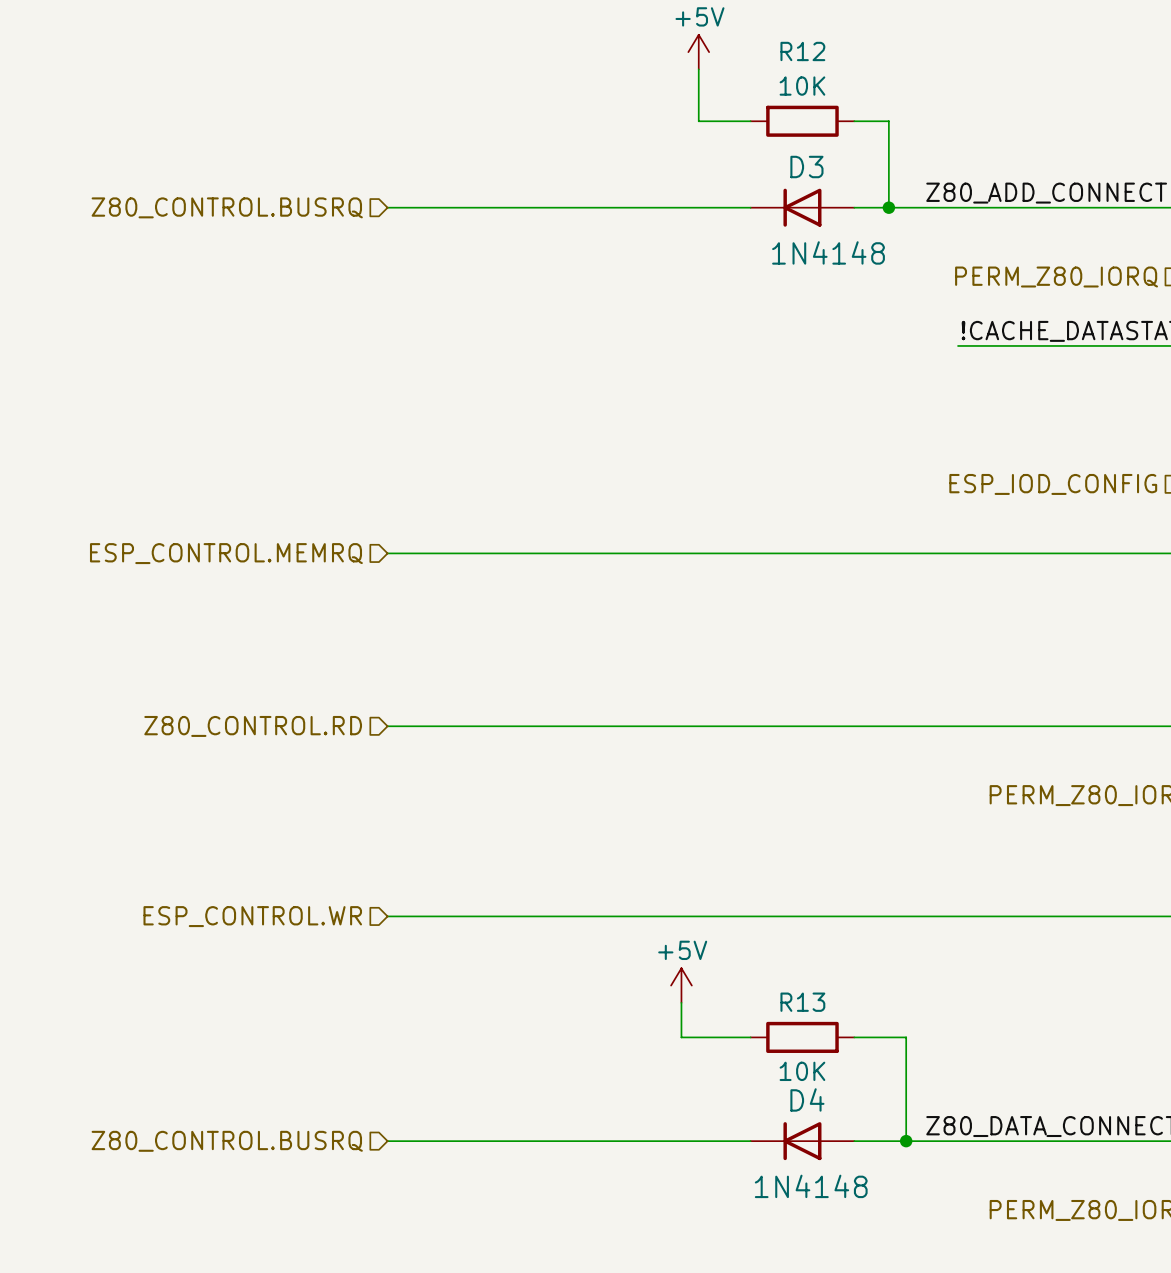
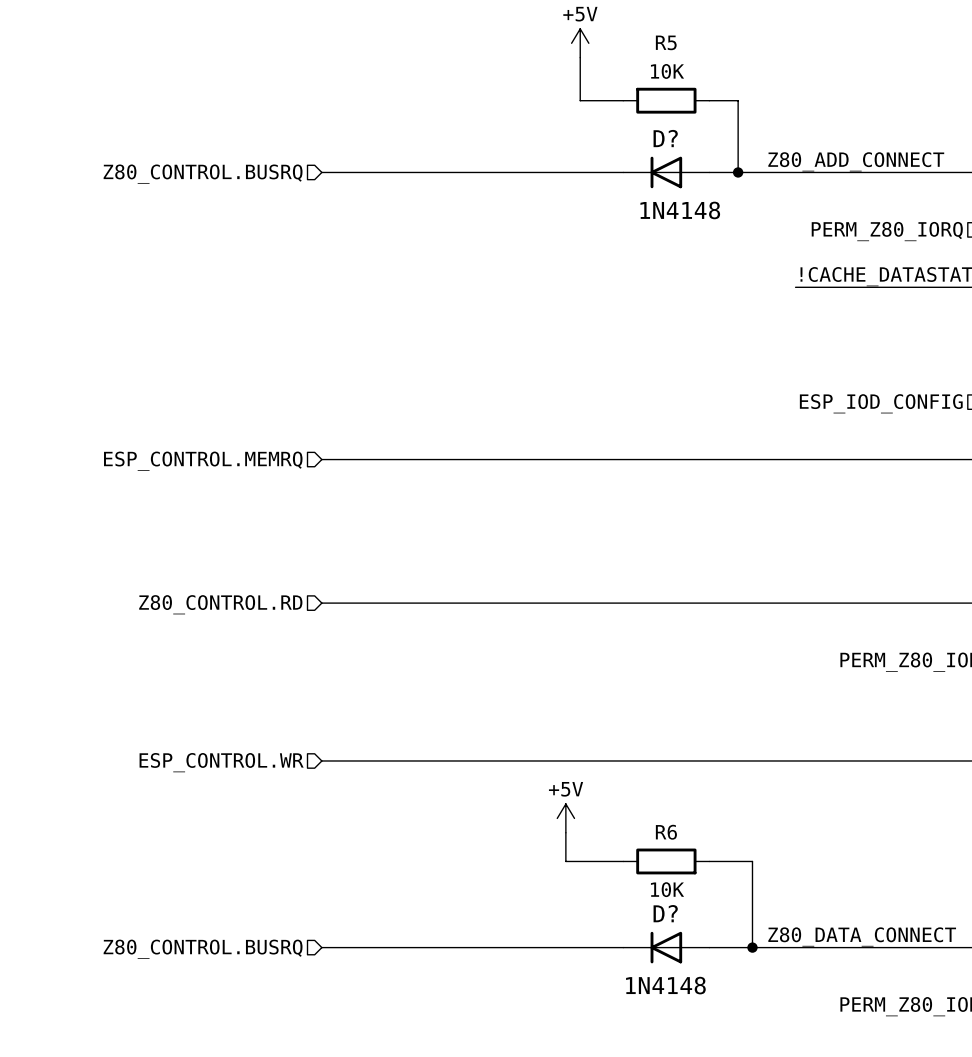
R12 name: R12 (802, 51) -> R5 (666, 42)
D3 name: D3 (806, 167) -> D? (665, 138)
R13 name: R13 (802, 1002) -> R6 (666, 832)
D4 name: D4 (807, 1099) -> D? (665, 913)

